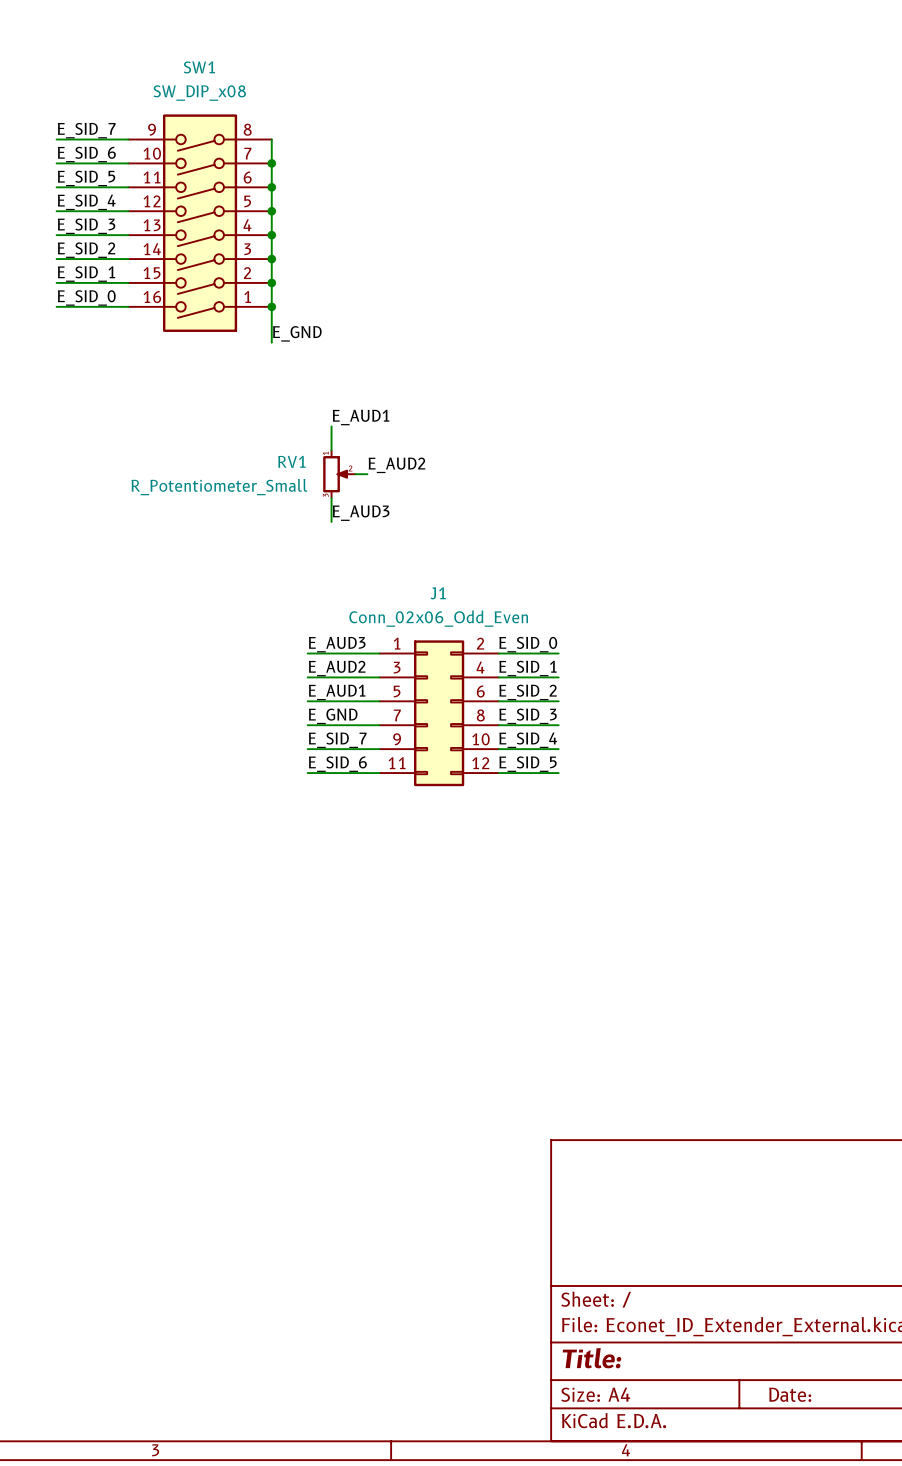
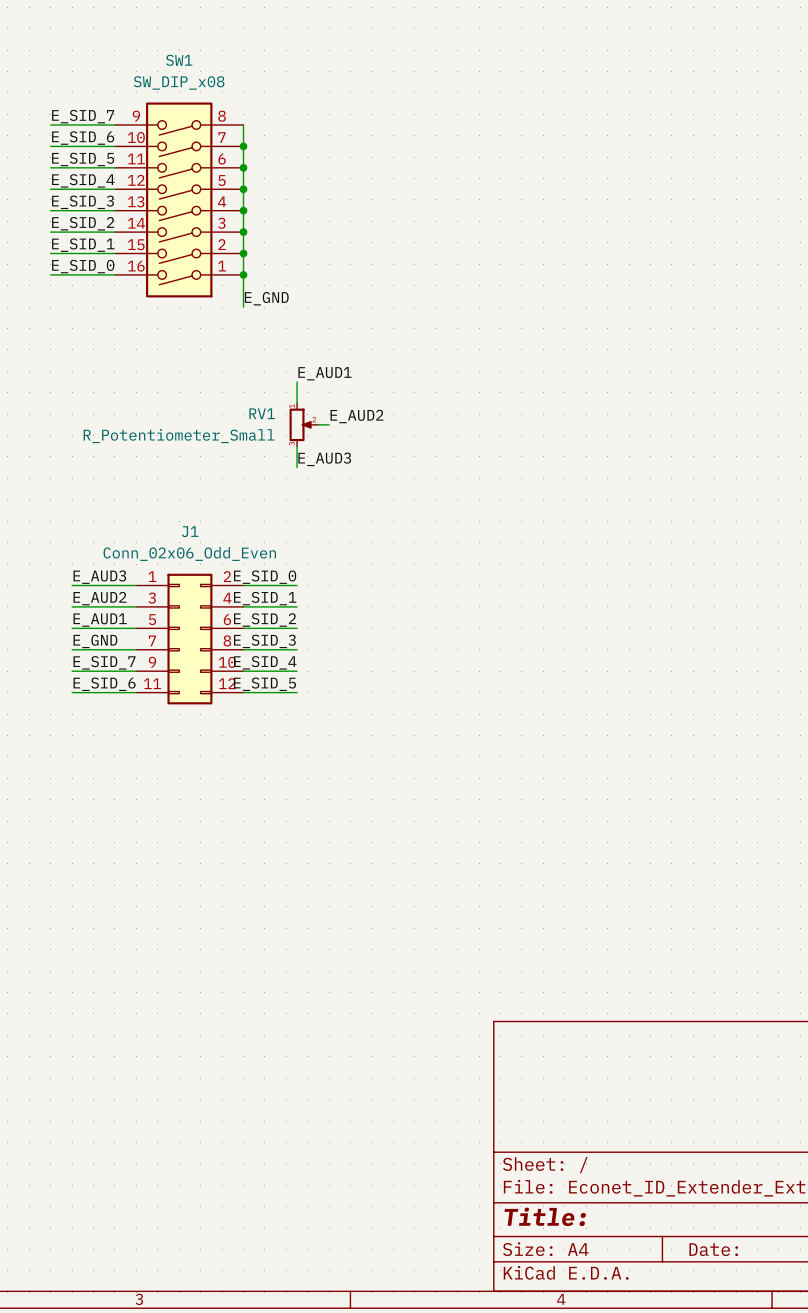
label position: E_AUD3 (337, 644) -> E_AUD3 (99, 577)
label position: E_SID_0 (528, 644) -> E_SID_0 (265, 577)
wire: none -> (72, 585) (136, 585)
wire: none -> (243, 585) (275, 585)
wire: (331, 653) (379, 653) -> none
wire: (498, 653) (558, 653) -> none
label position: E_AUD2 (337, 668) -> E_AUD2 (99, 598)
label position: E_SID_1 (528, 668) -> E_SID_1 (265, 598)
wire: none -> (72, 606) (136, 606)
wire: none -> (243, 606) (275, 606)
wire: (331, 677) (379, 677) -> none
wire: (498, 677) (558, 677) -> none
label position: E_AUD1 (337, 692) -> E_AUD1 (100, 620)
label position: E_SID_2 (528, 692) -> E_SID_2 (265, 620)
wire: none -> (72, 628) (136, 628)
wire: none -> (243, 628) (275, 628)
wire: (331, 701) (379, 701) -> none
wire: (498, 701) (558, 701) -> none
J1 position: (439, 713) -> (189, 639)
label position: E_GND (333, 716) -> E_GND (95, 641)
label position: E_SID_3 (528, 716) -> E_SID_3 (264, 641)
wire: none -> (72, 649) (136, 649)
wire: none -> (243, 649) (275, 649)
wire: (331, 725) (379, 725) -> none
wire: (498, 725) (558, 725) -> none
label position: E_SID_7 (337, 740) -> E_SID_7 (104, 662)
label position: E_SID_4 (528, 740) -> E_SID_4 (265, 662)
wire: none -> (72, 671) (136, 671)
wire: none -> (243, 671) (275, 671)
wire: (331, 749) (379, 749) -> none
wire: (498, 749) (558, 749) -> none
label position: E_SID_6 (337, 764) -> E_SID_6 (104, 684)
label position: E_SID_5 (528, 764) -> E_SID_5 (265, 684)
wire: none -> (72, 692) (136, 692)
wire: none -> (243, 692) (275, 692)
wire: (331, 773) (379, 773) -> none
wire: (498, 773) (558, 773) -> none

